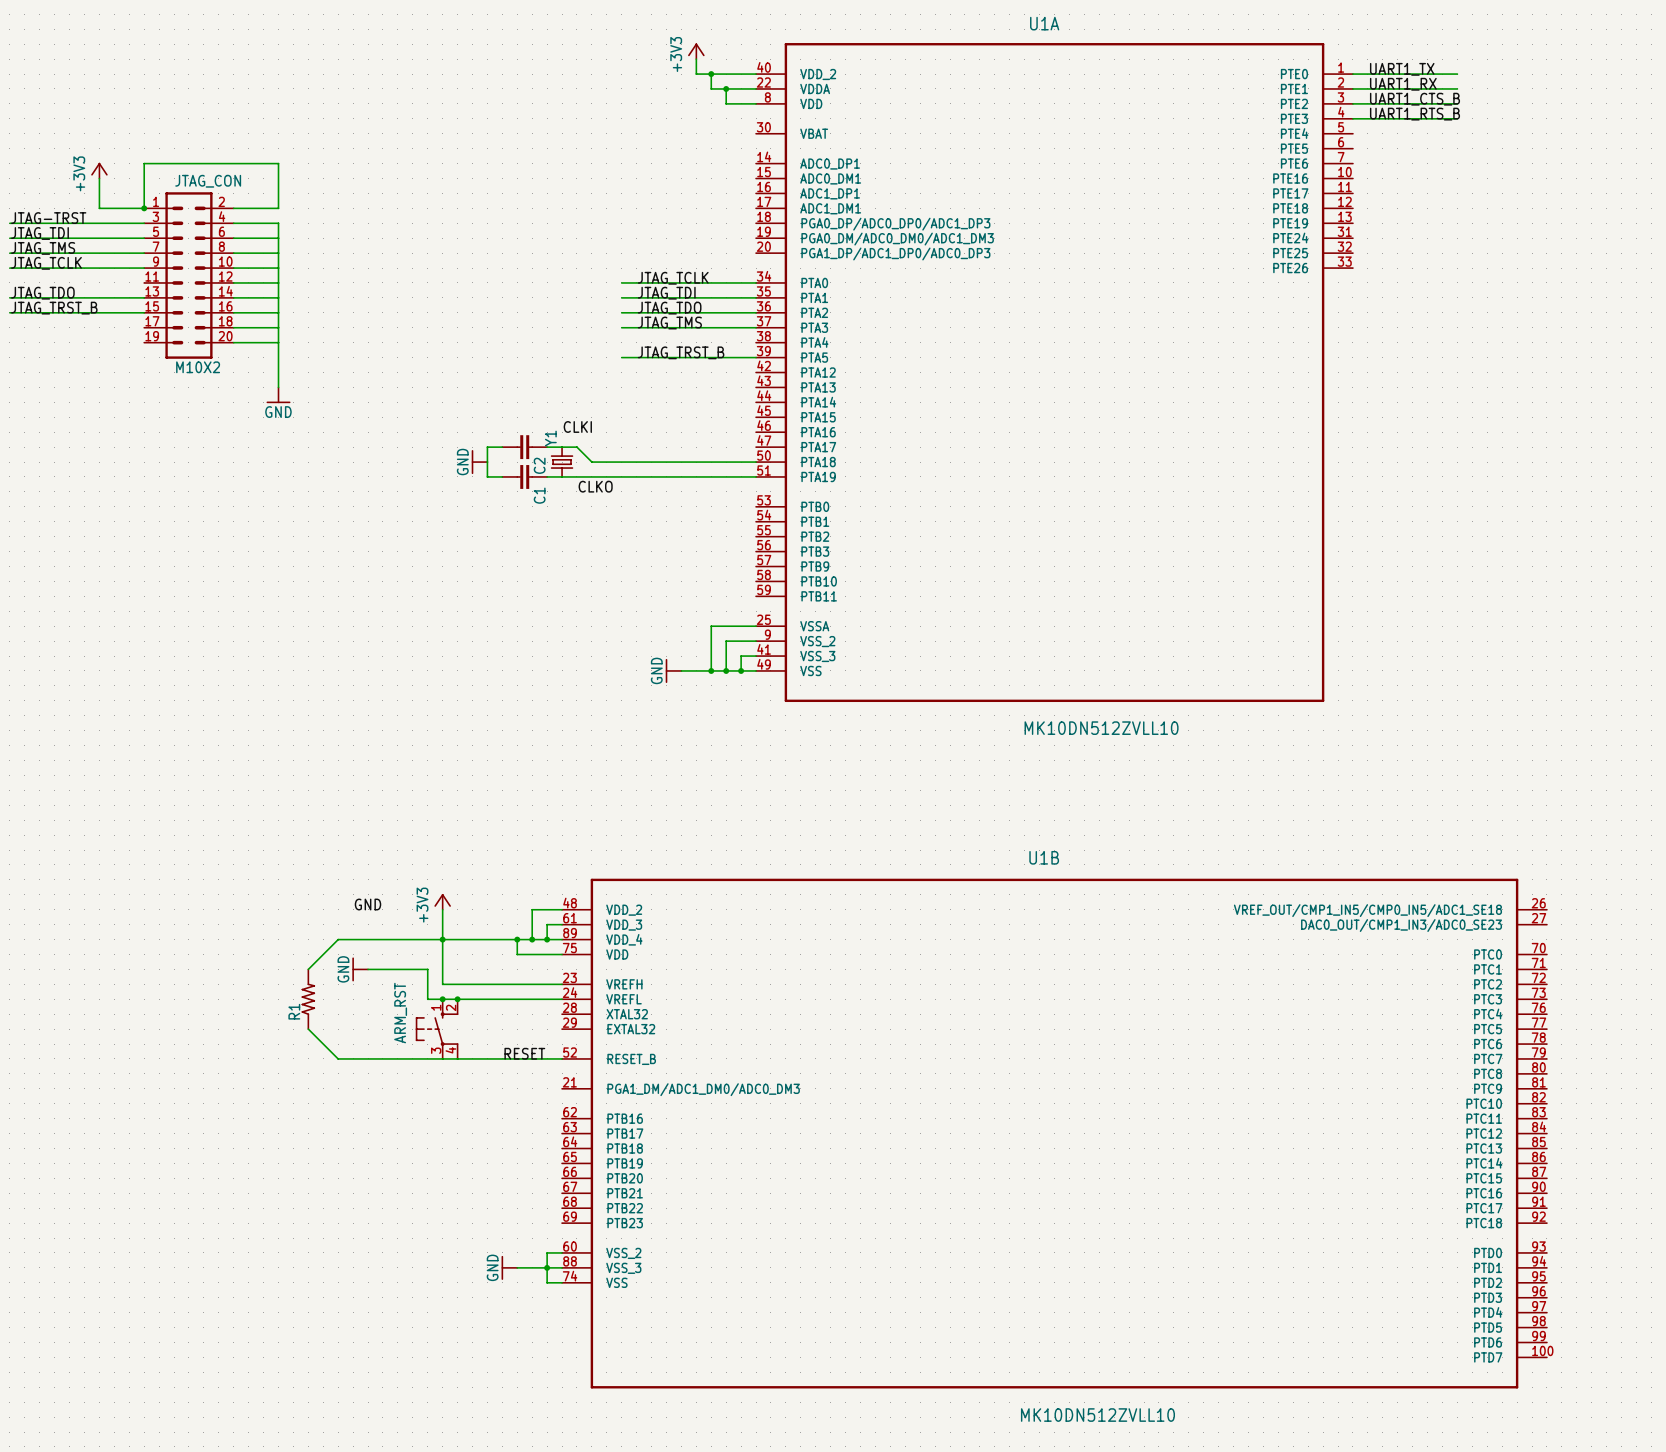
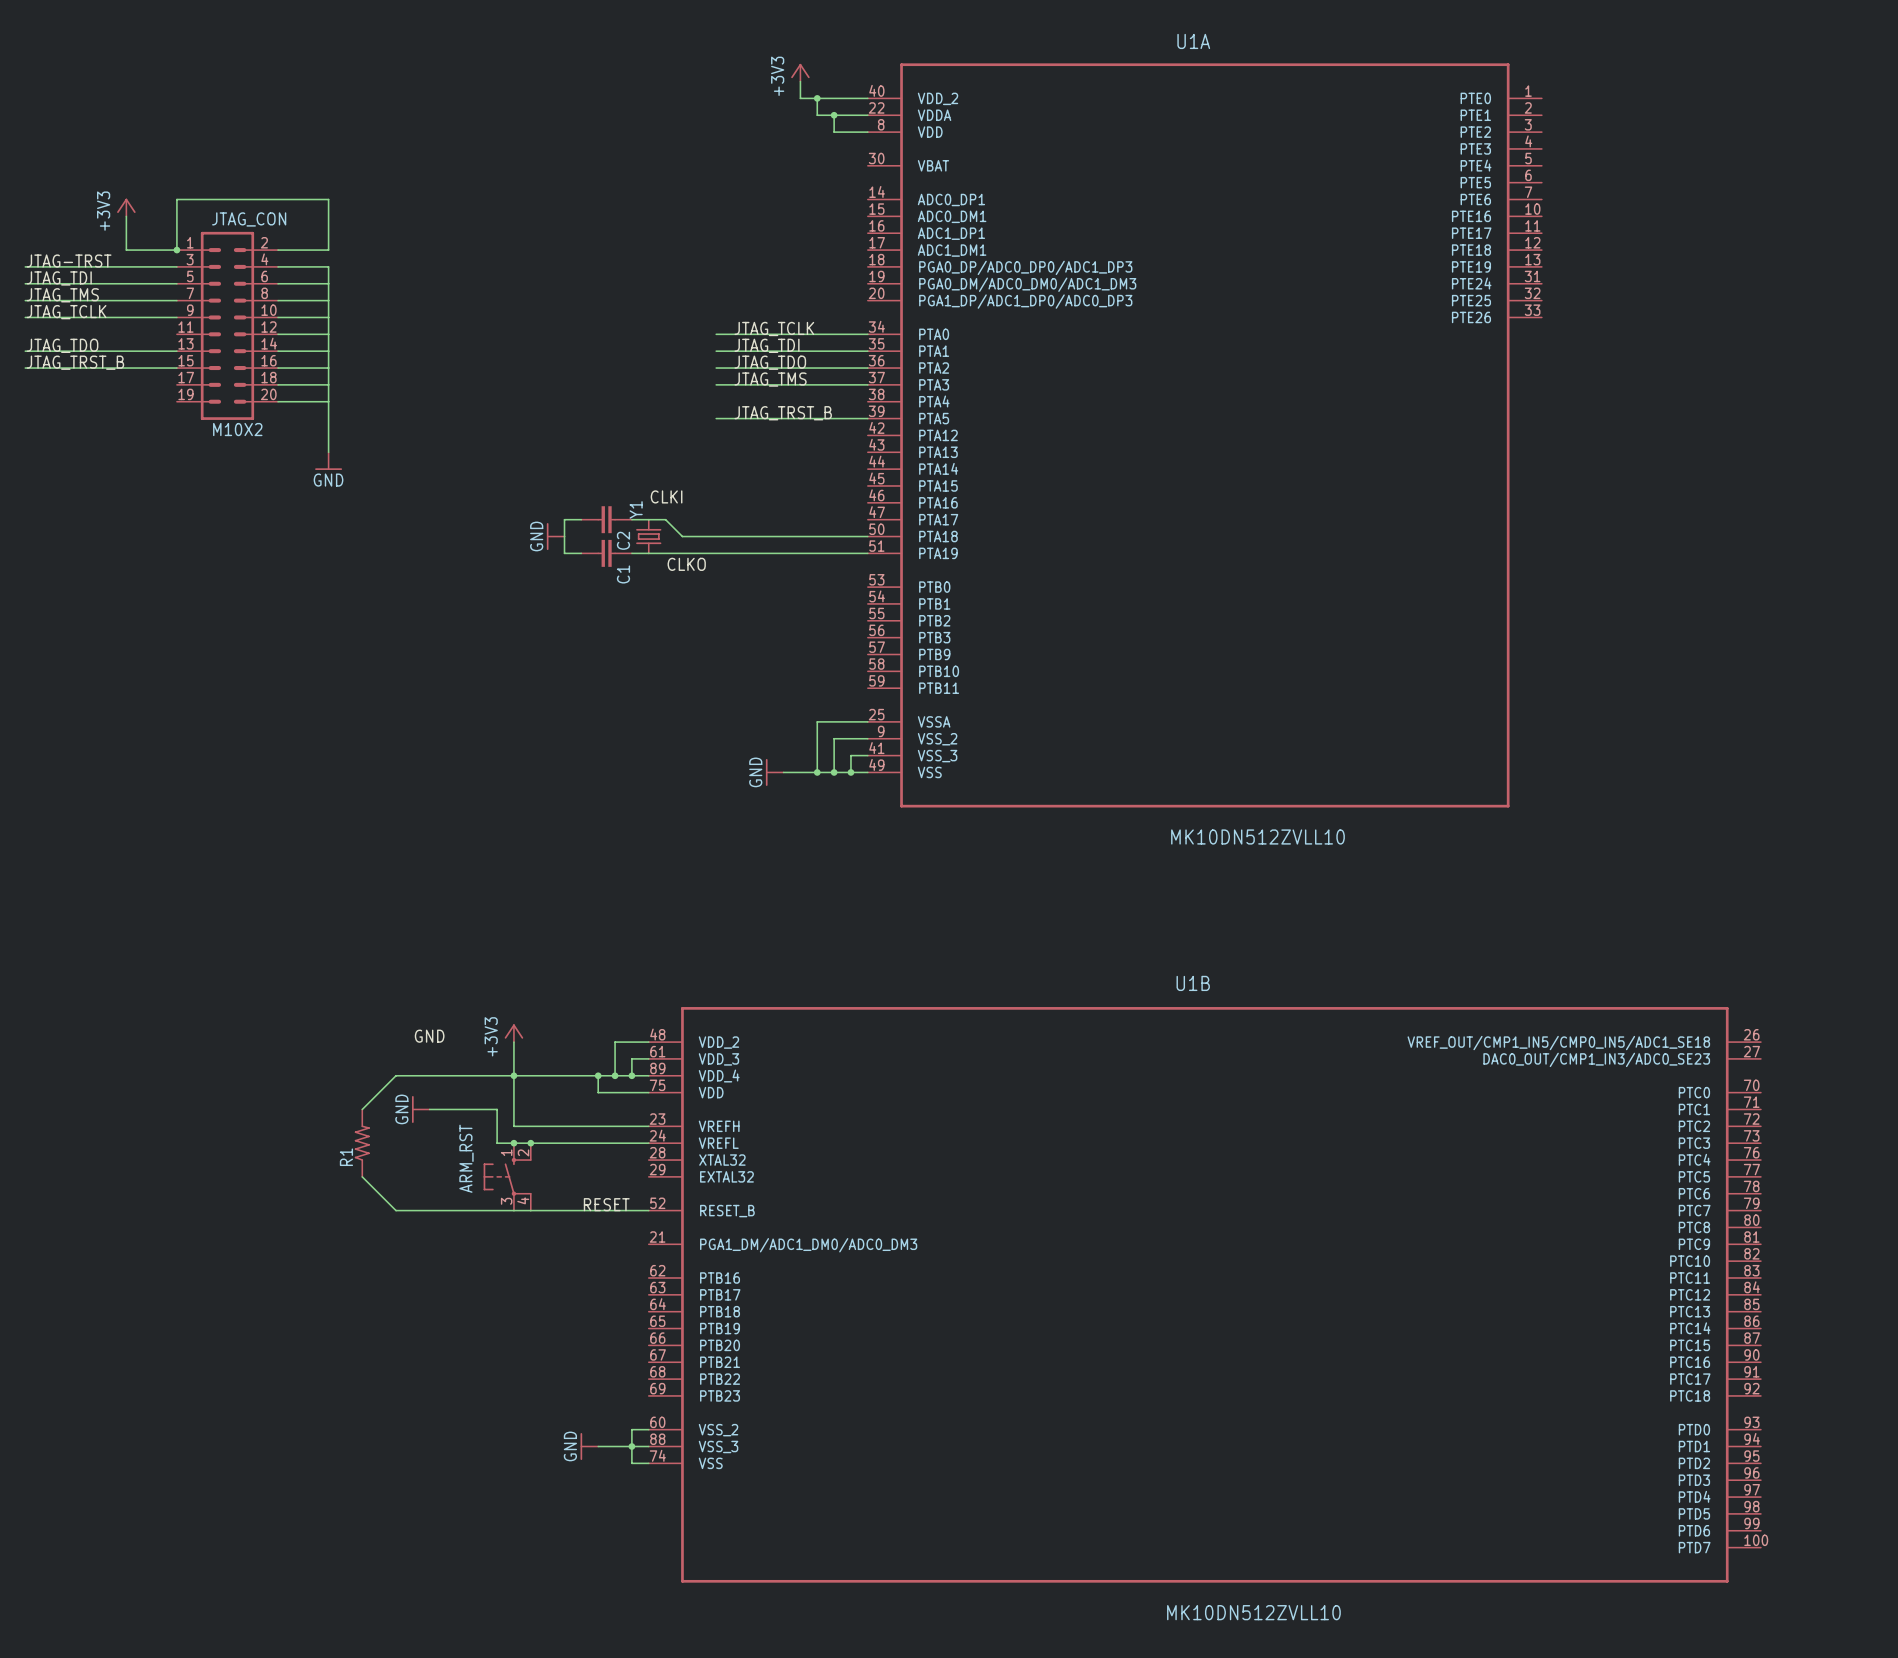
label: UART1_TX (1402, 69) -> none
wire: (1352, 74) (1457, 74) -> none
label: UART1_RX (1403, 84) -> none
wire: (1352, 88) (1457, 88) -> none
label: UART1_CTS_B (1414, 99) -> none
wire: (1352, 103) (1457, 103) -> none
label: UART1_RTS_B (1414, 114) -> none
wire: (1352, 118) (1457, 118) -> none

